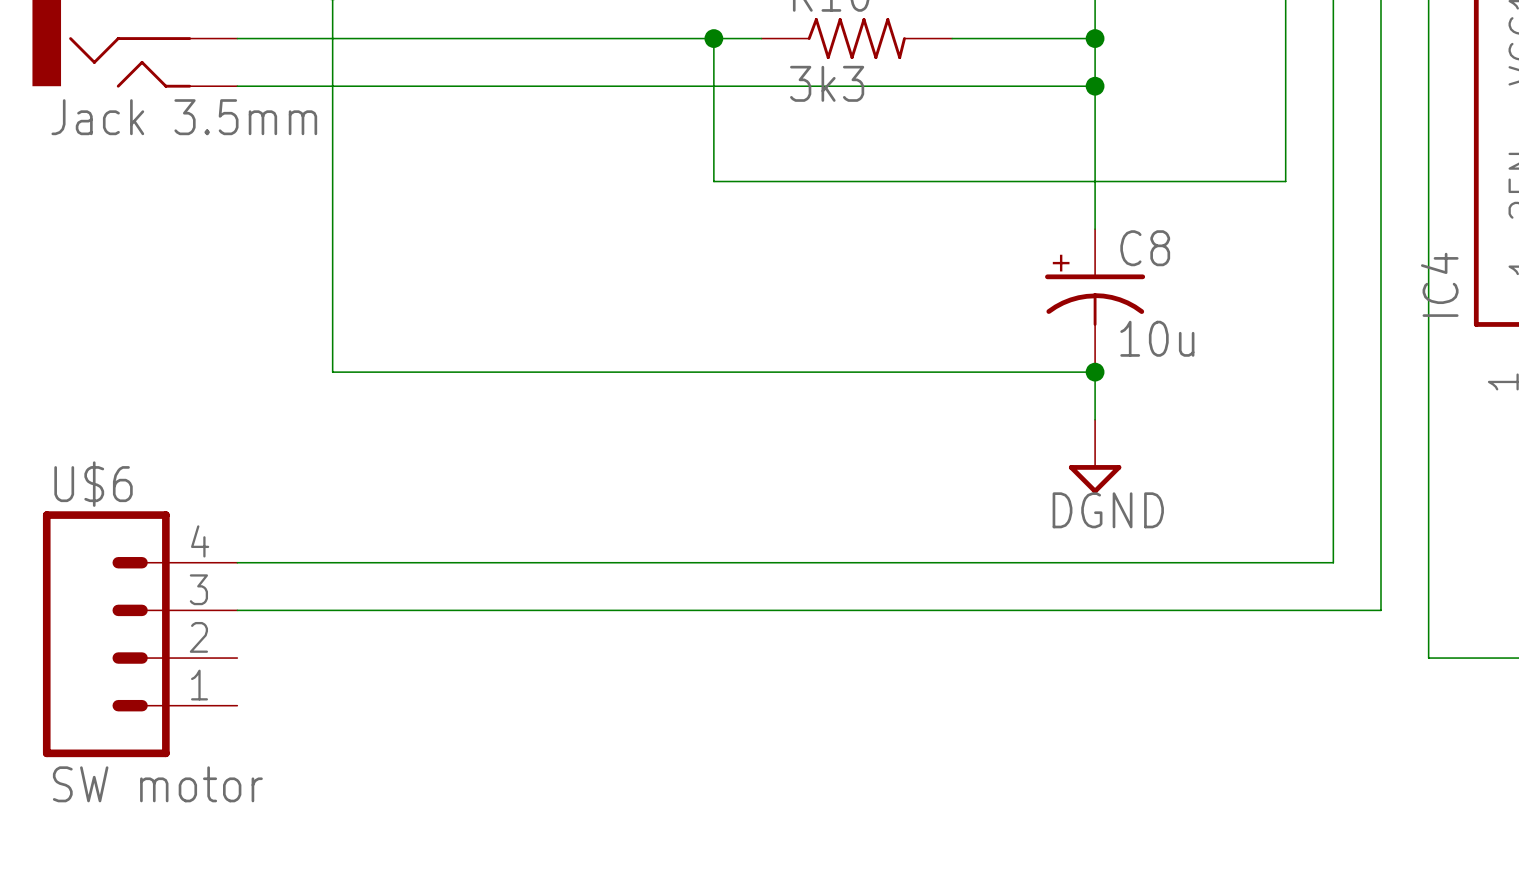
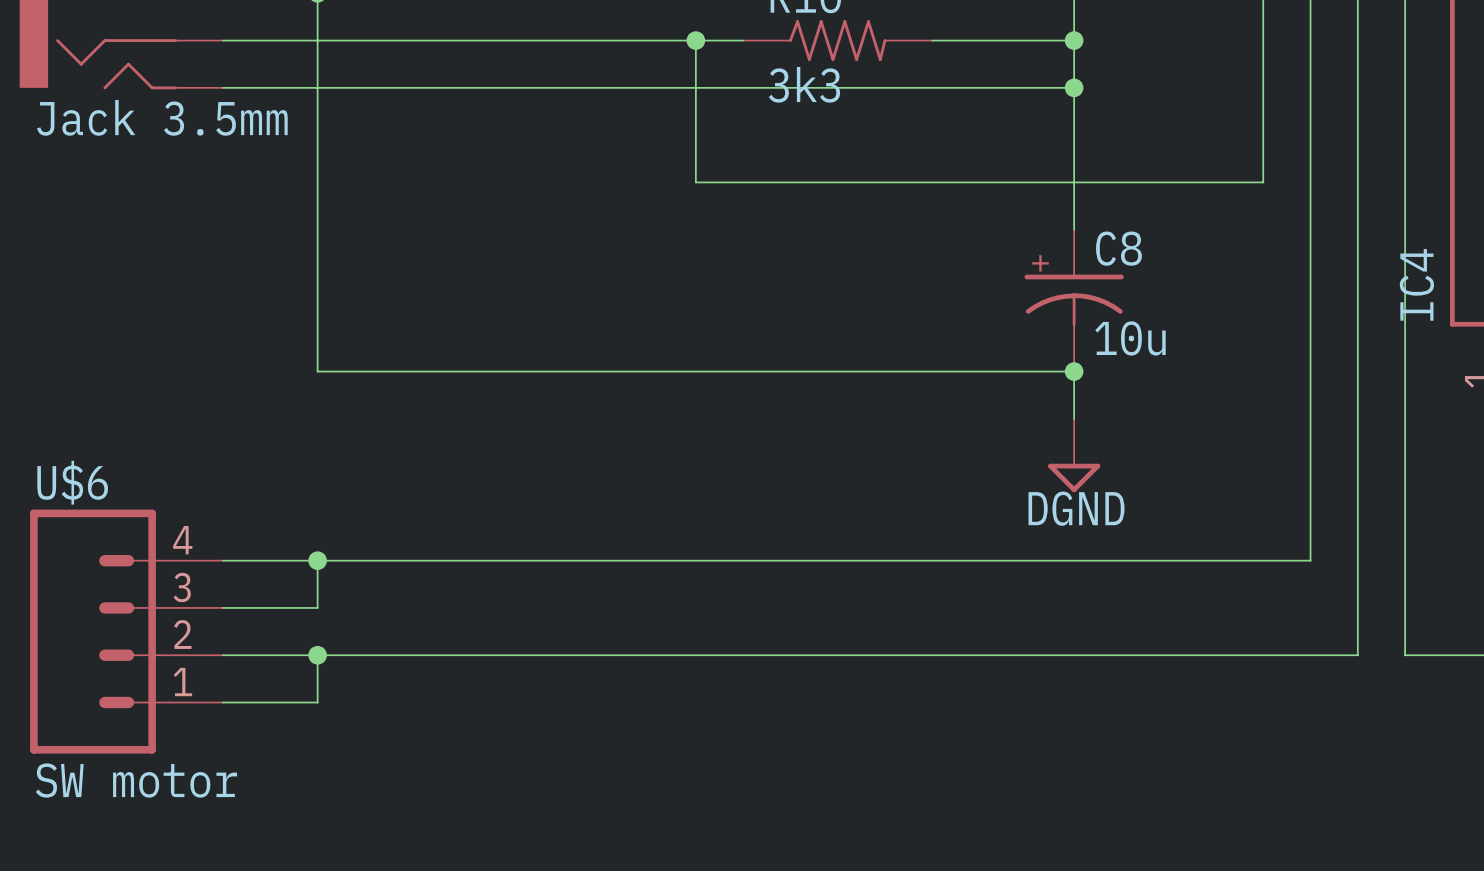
wire: none -> (317, 560) (317, 607)
junction: none -> (317, 560)
wire: (332, 610) (1380, 610) -> (223, 655) (1357, 655) (1357, 607)
wire: none -> (317, 655) (317, 702) (223, 702)
junction: none -> (317, 655)

